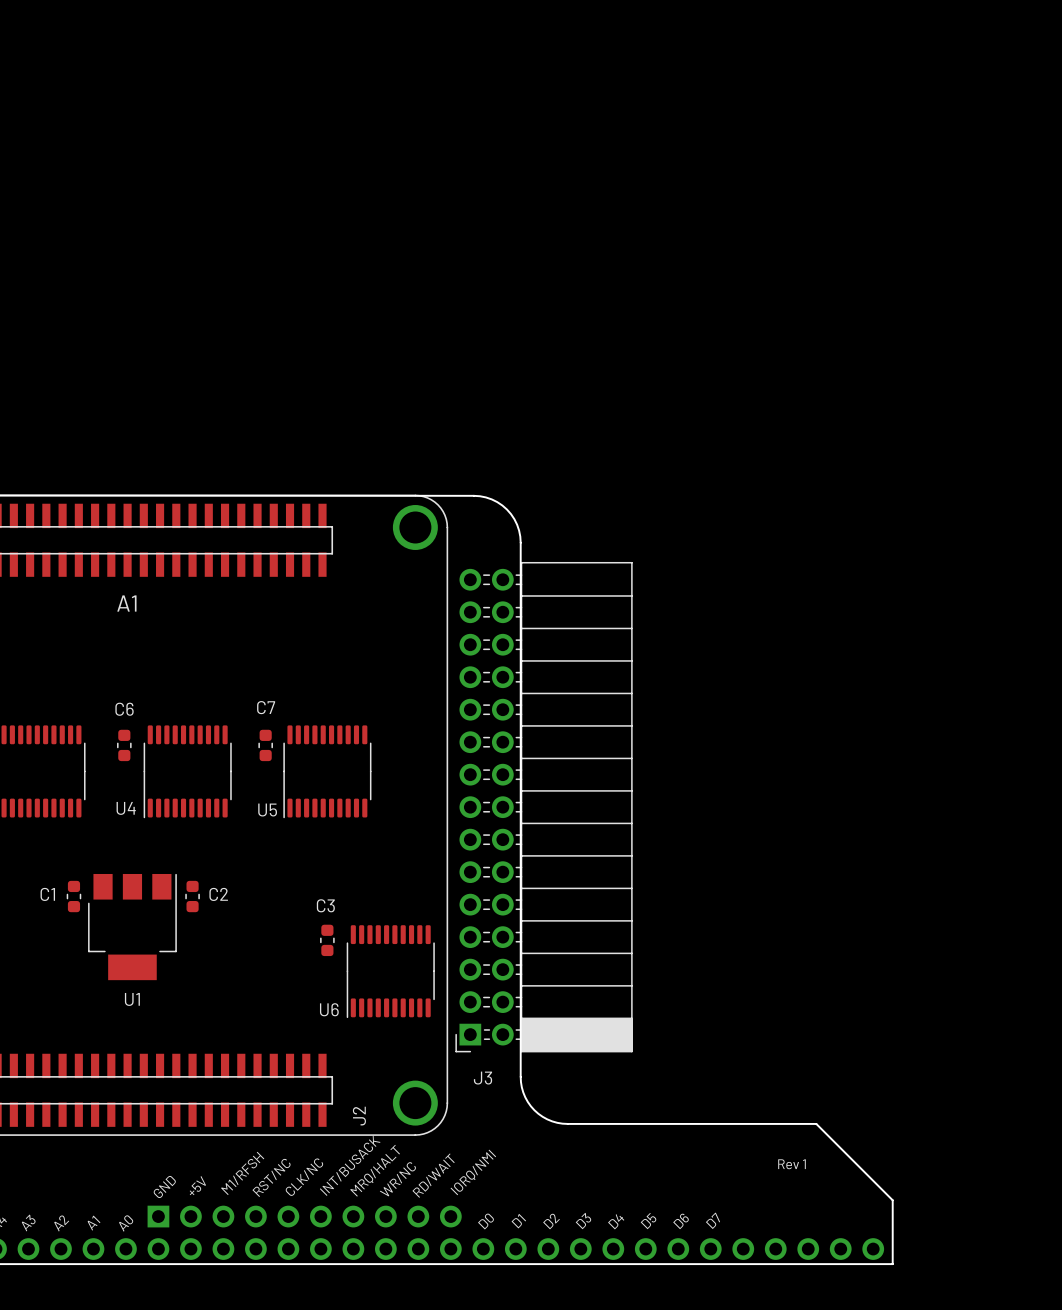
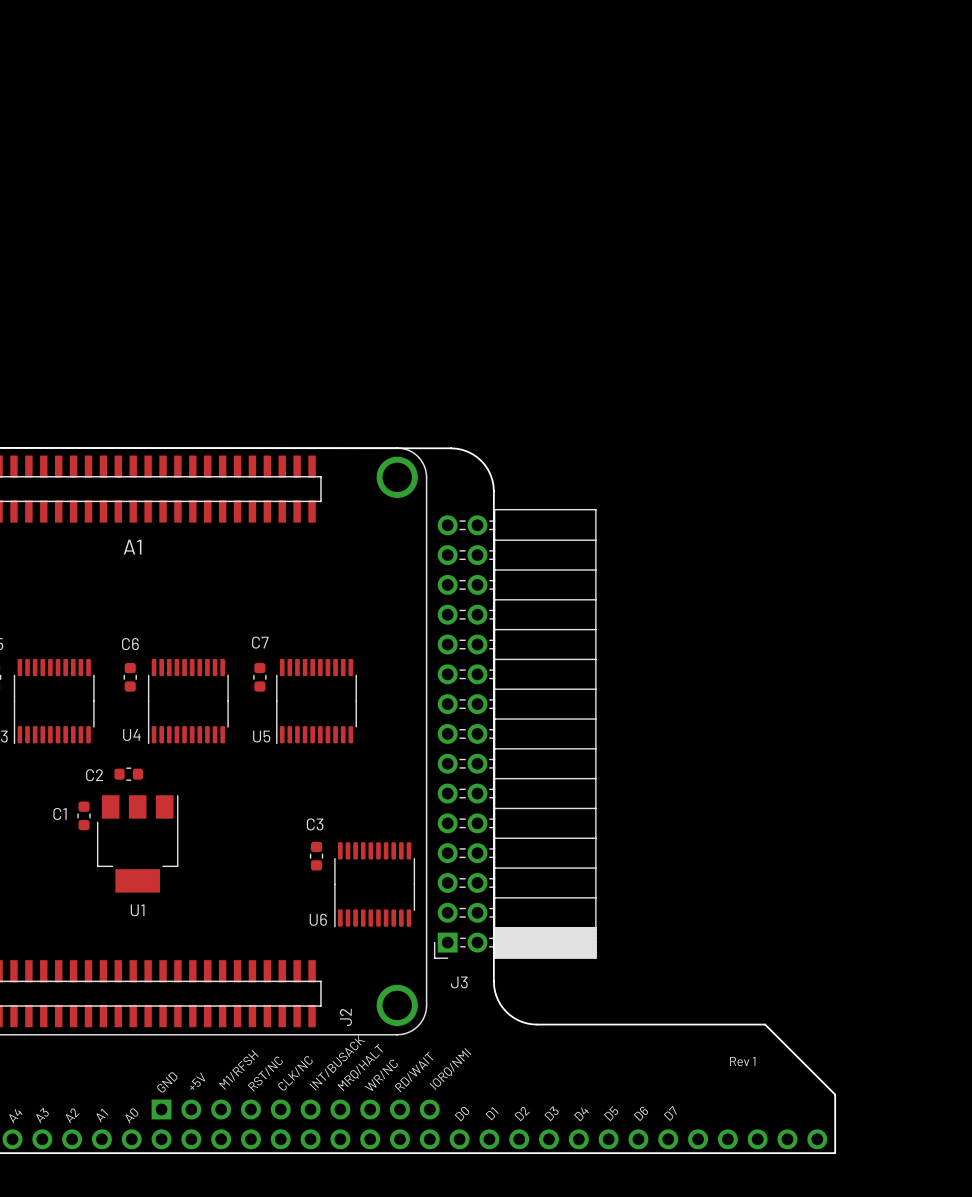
C2 name position: C2 (218, 894) -> C2 (94, 775)
C2 rotation: 0° (192, 896) -> 90° clockwise (128, 774)
C2 position: (192, 896) -> (128, 774)

